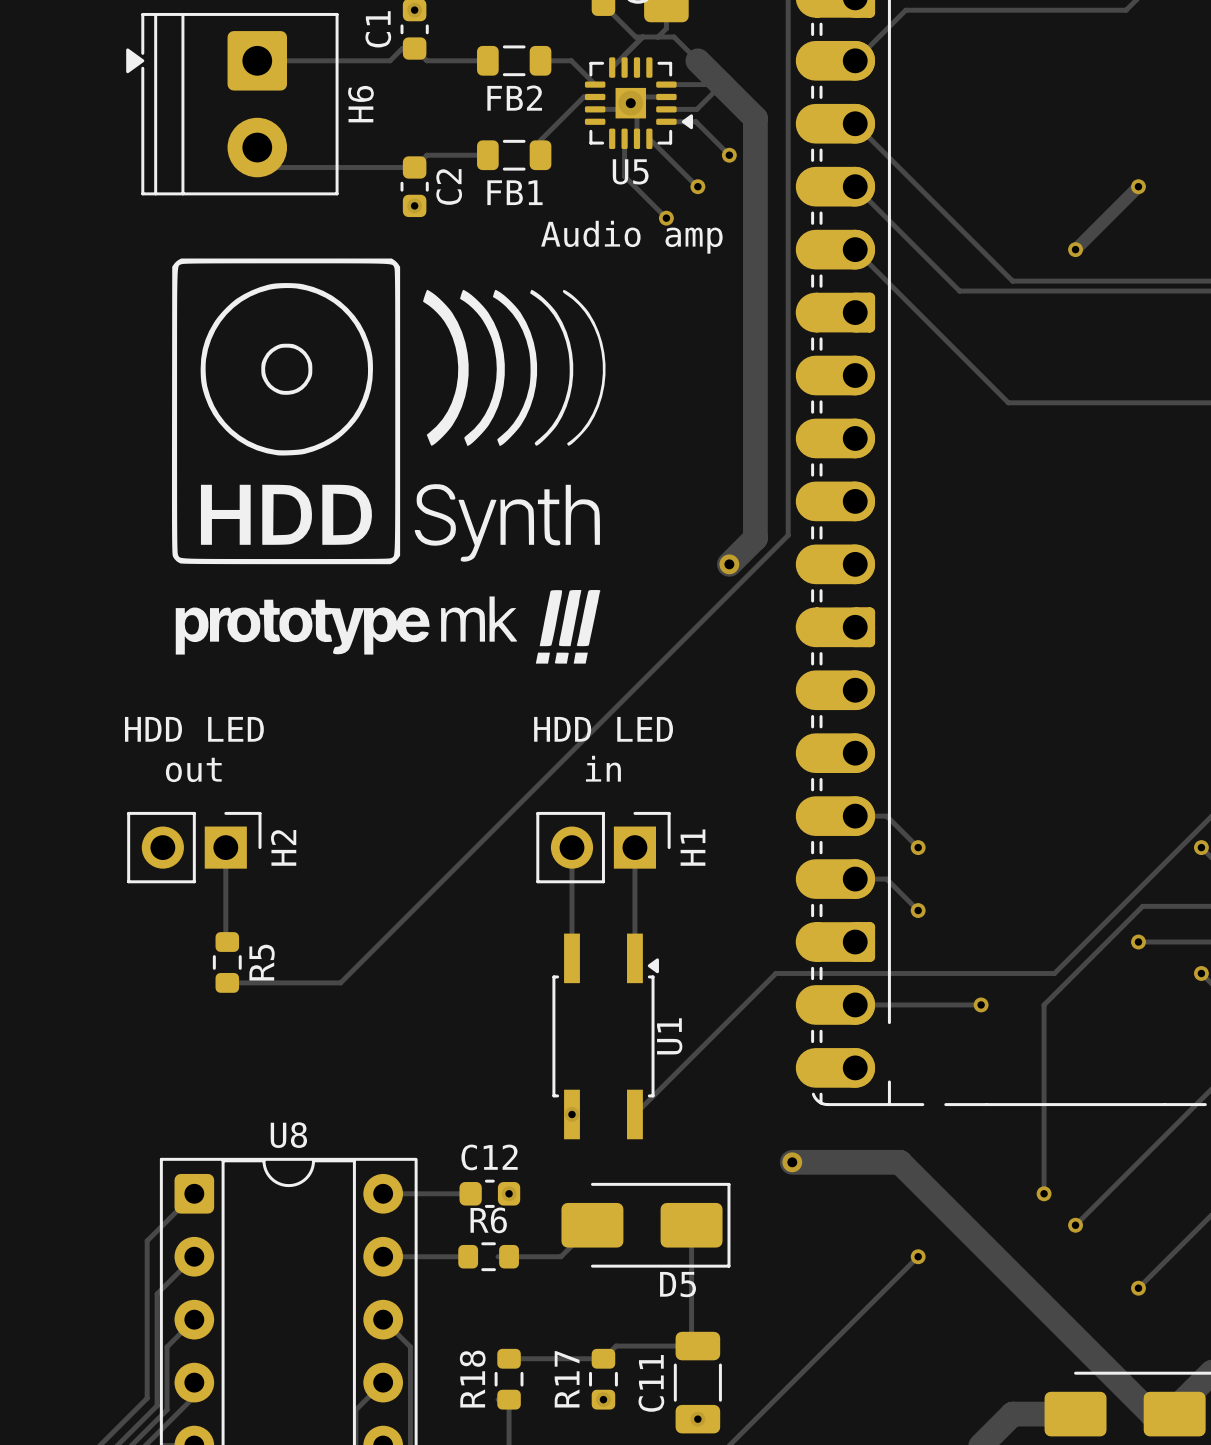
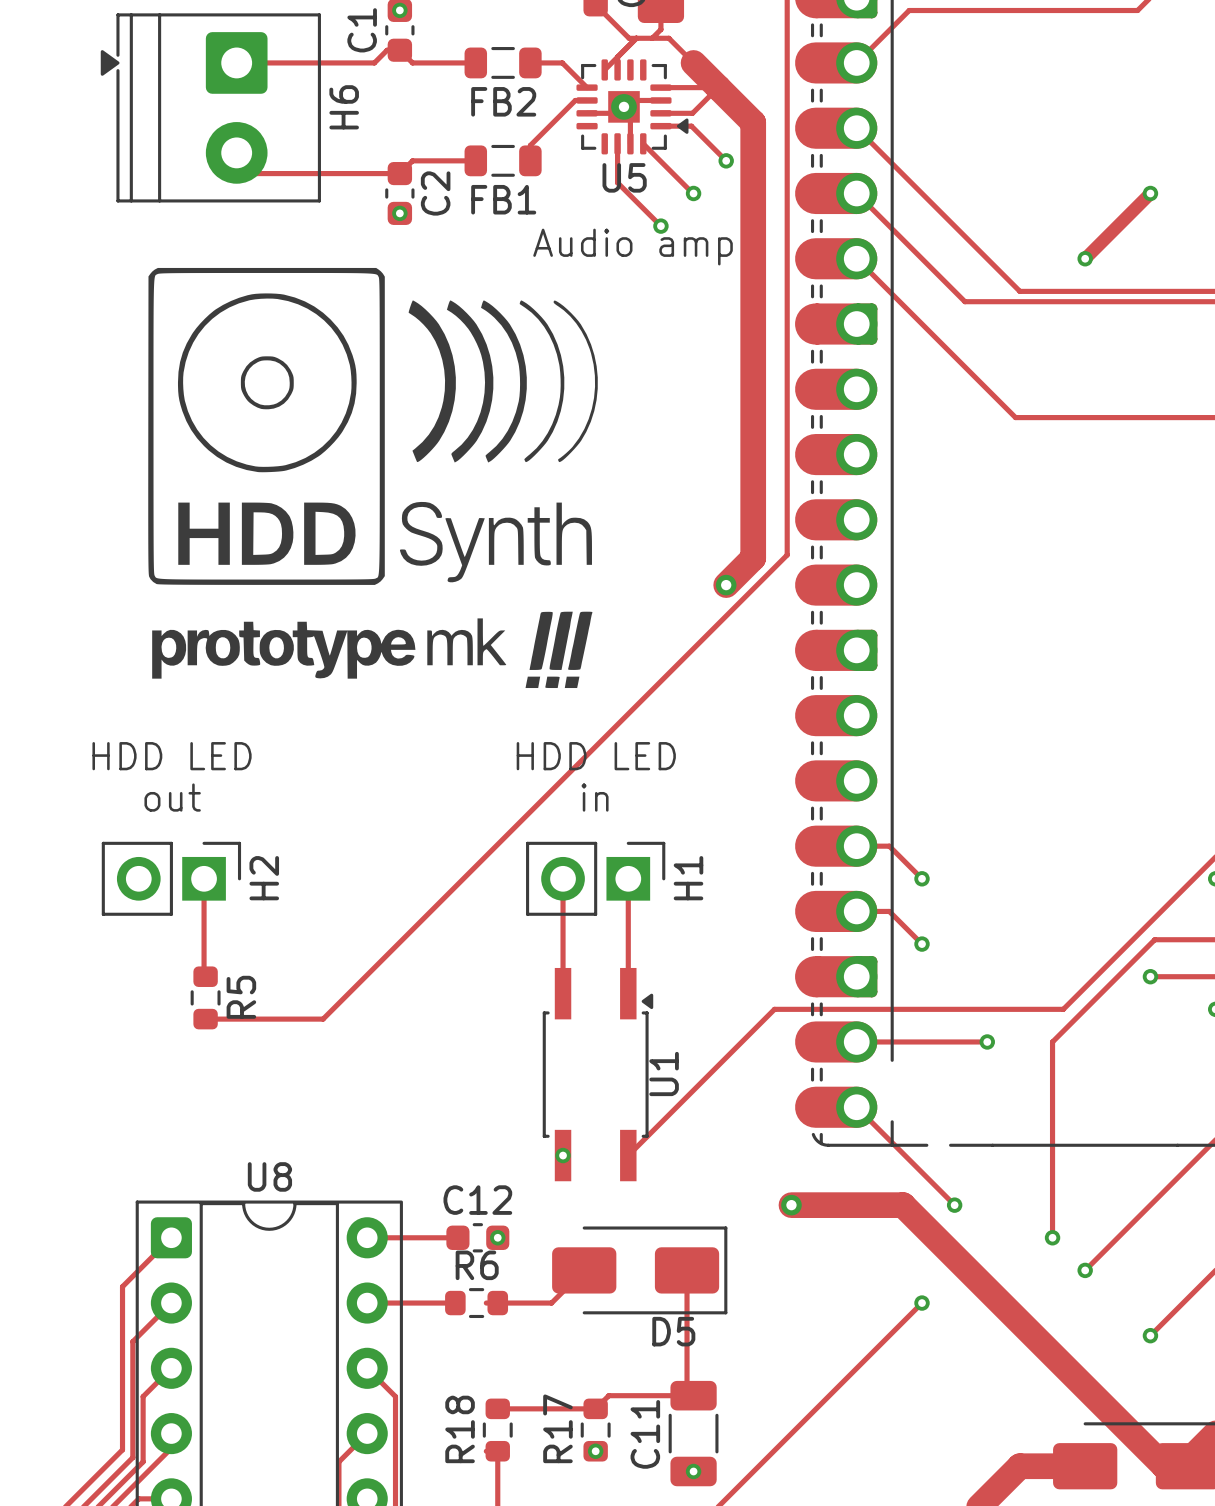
track: none -> (856, 1107) (954, 1205)
via: none -> (954, 1205)

